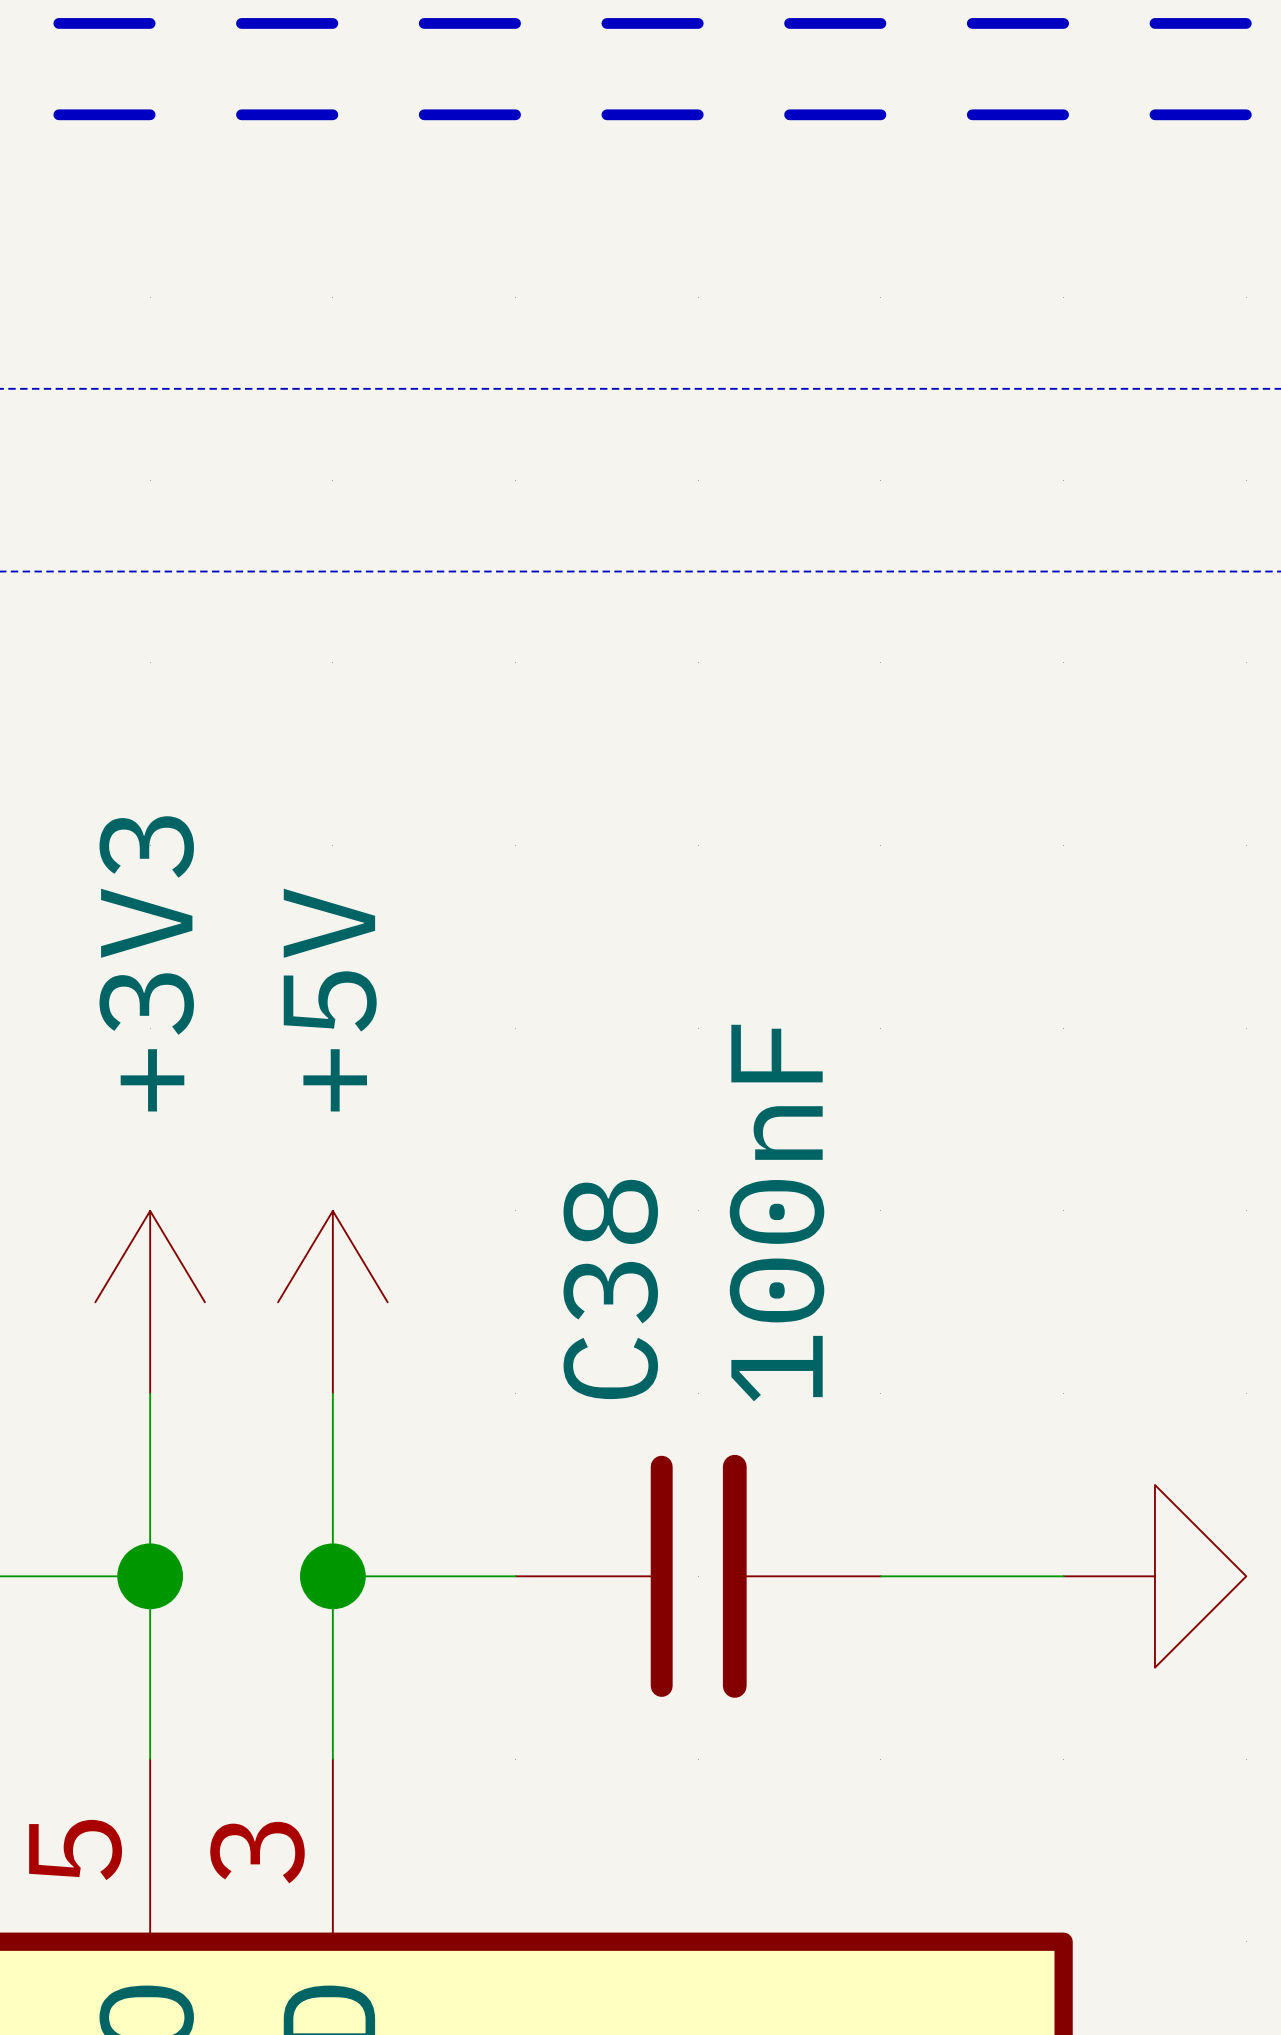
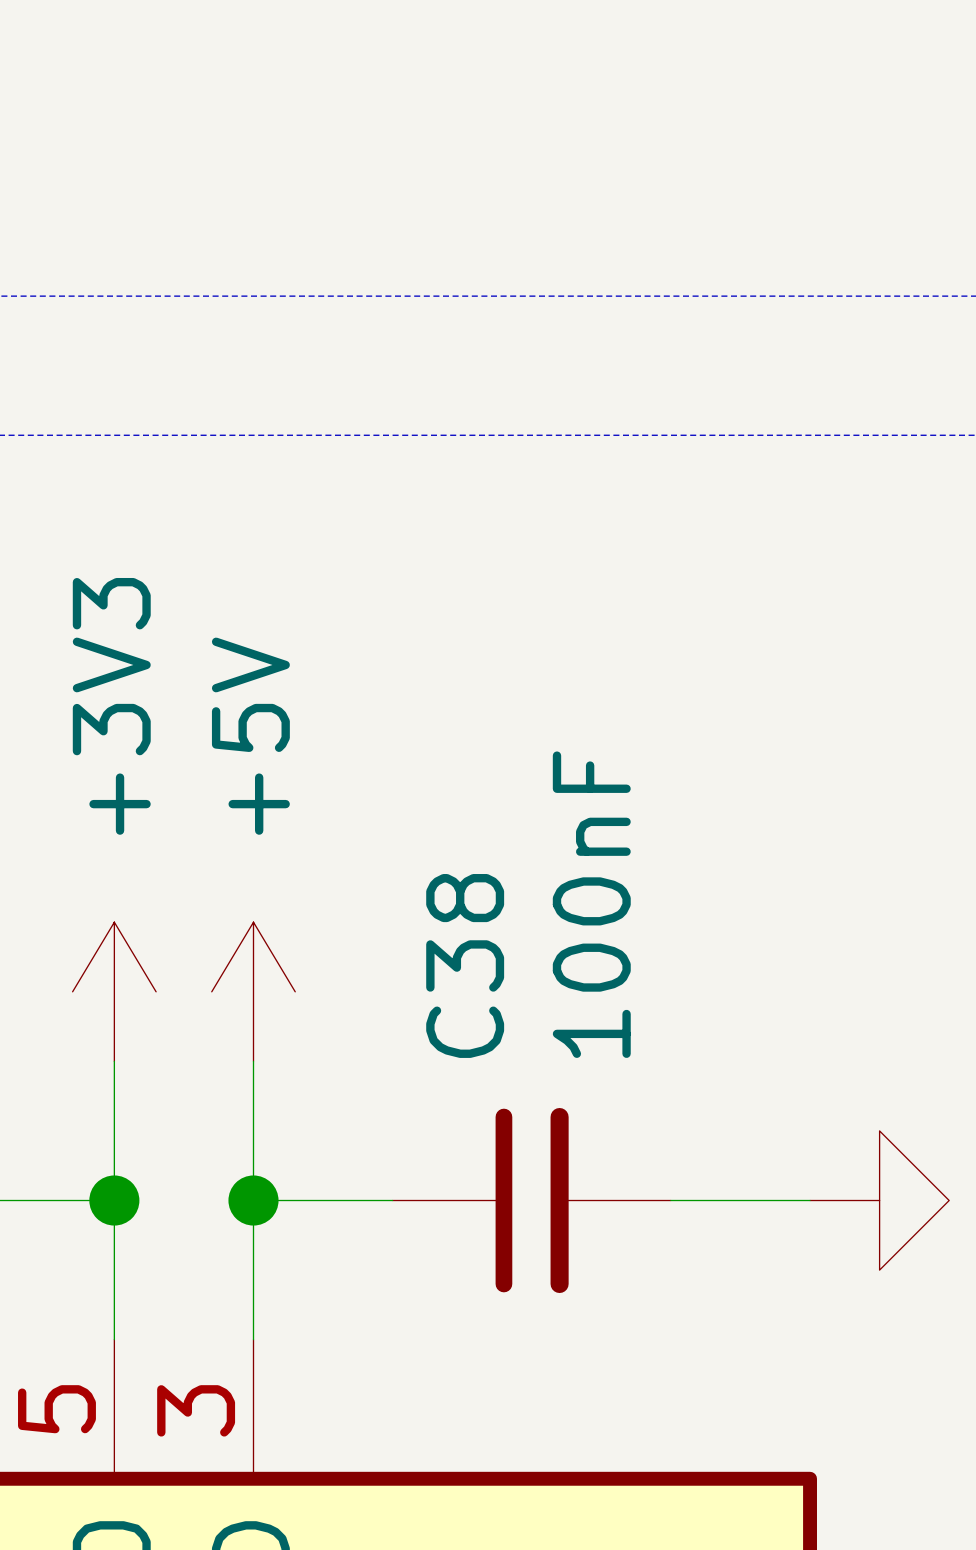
line: (58, 23) (150, 23) -> none
line: (241, 23) (332, 23) -> none
line: (424, 23) (515, 23) -> none
line: (606, 23) (698, 23) -> none
line: (789, 23) (880, 23) -> none
line: (972, 23) (1063, 23) -> none
line: (1154, 23) (1246, 23) -> none
line: (58, 114) (150, 114) -> none
line: (241, 114) (332, 114) -> none
line: (424, 114) (515, 114) -> none
line: (606, 114) (698, 114) -> none
line: (789, 114) (880, 114) -> none
line: (972, 114) (1063, 114) -> none
line: (1154, 114) (1246, 114) -> none

